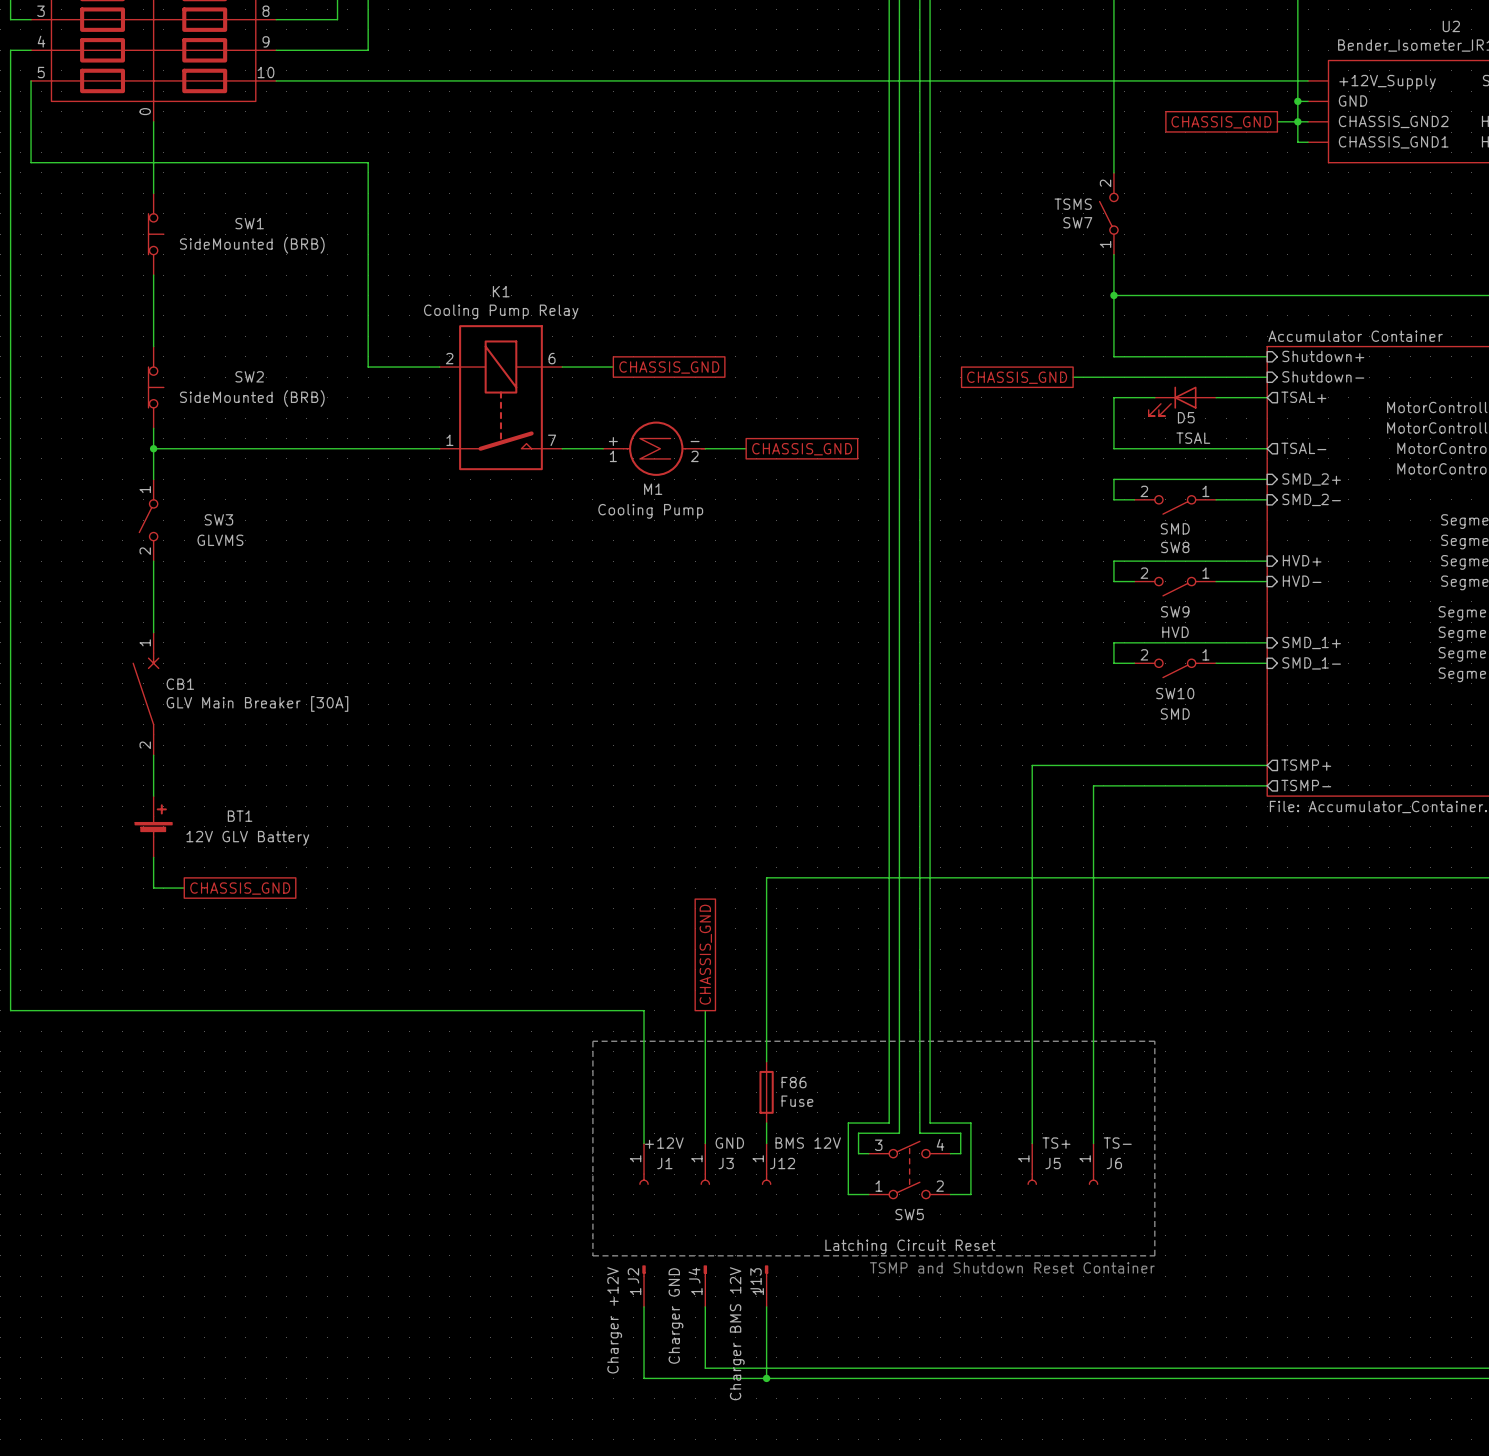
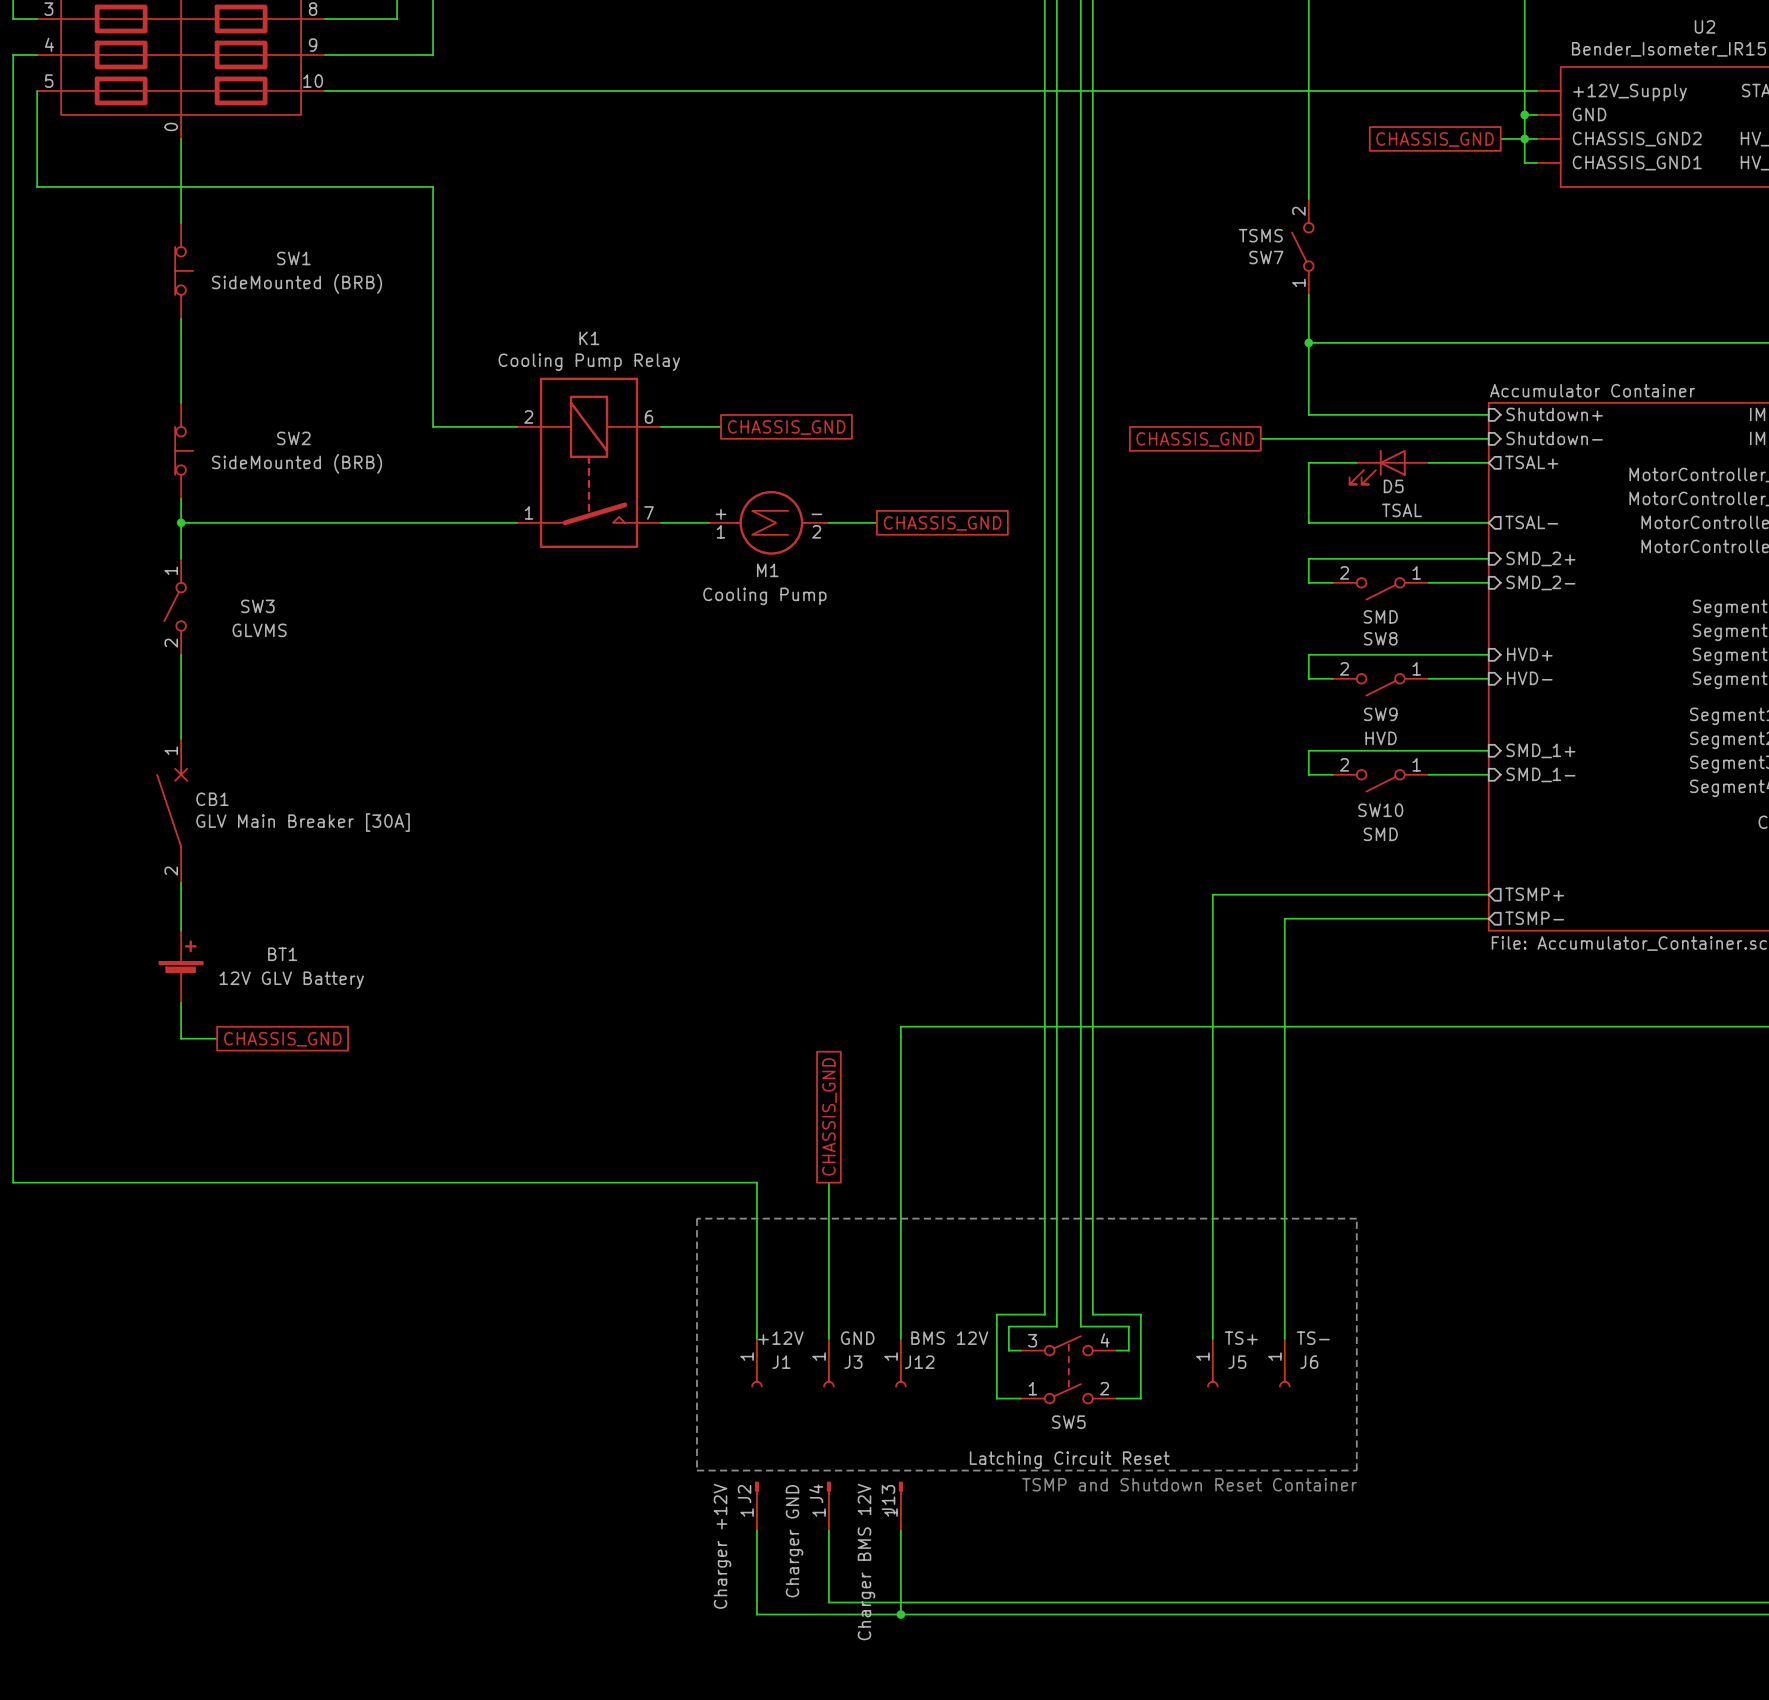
F86: Fuse (766, 1092) -> none

